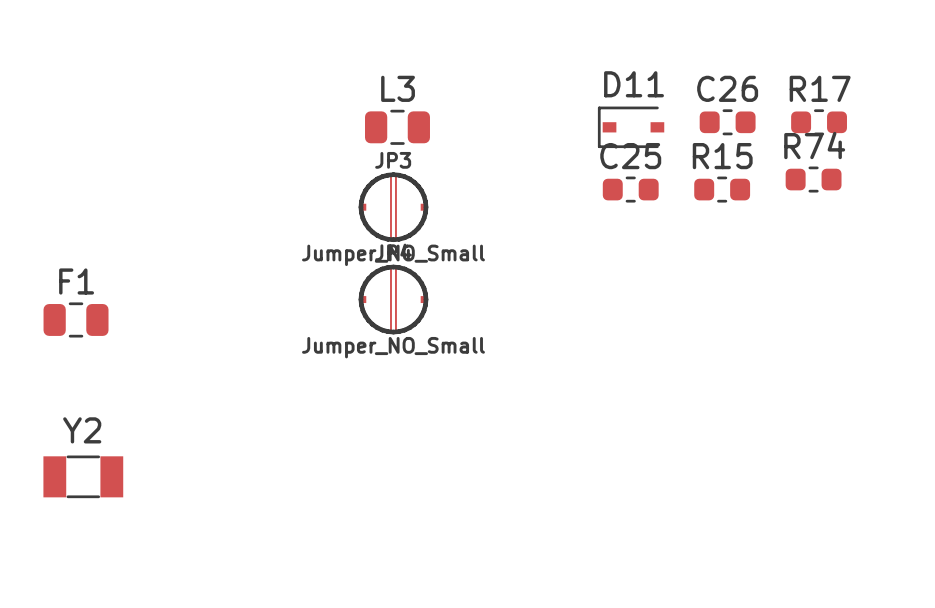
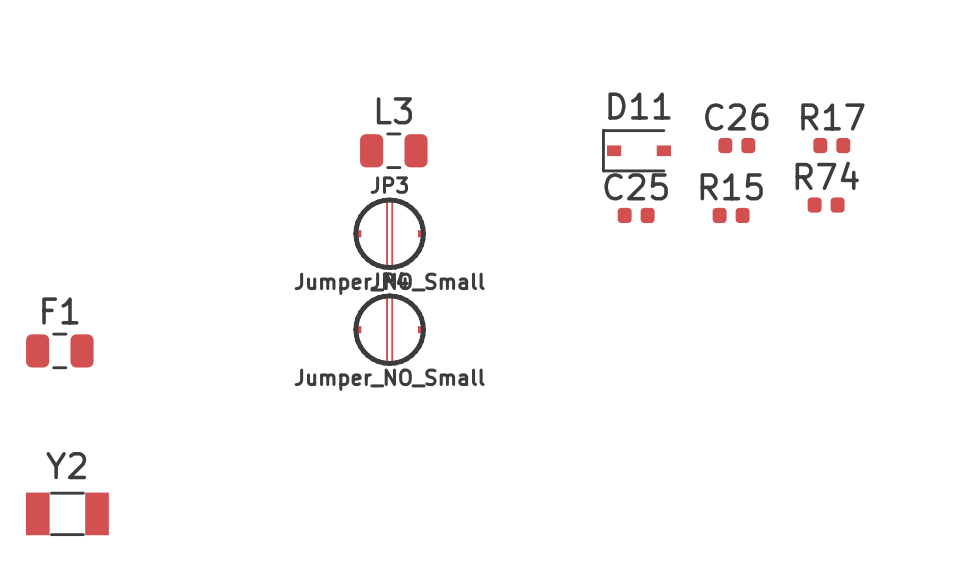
C26 footprint: [699, 109, 756, 136] -> [718, 137, 756, 154]
R17 footprint: [791, 109, 847, 136] -> [813, 137, 851, 154]
R74 footprint: [785, 166, 842, 193] -> [807, 197, 845, 213]
C25 footprint: [602, 176, 659, 203] -> [617, 207, 655, 224]
R15 footprint: [694, 176, 751, 203] -> [712, 207, 750, 224]

